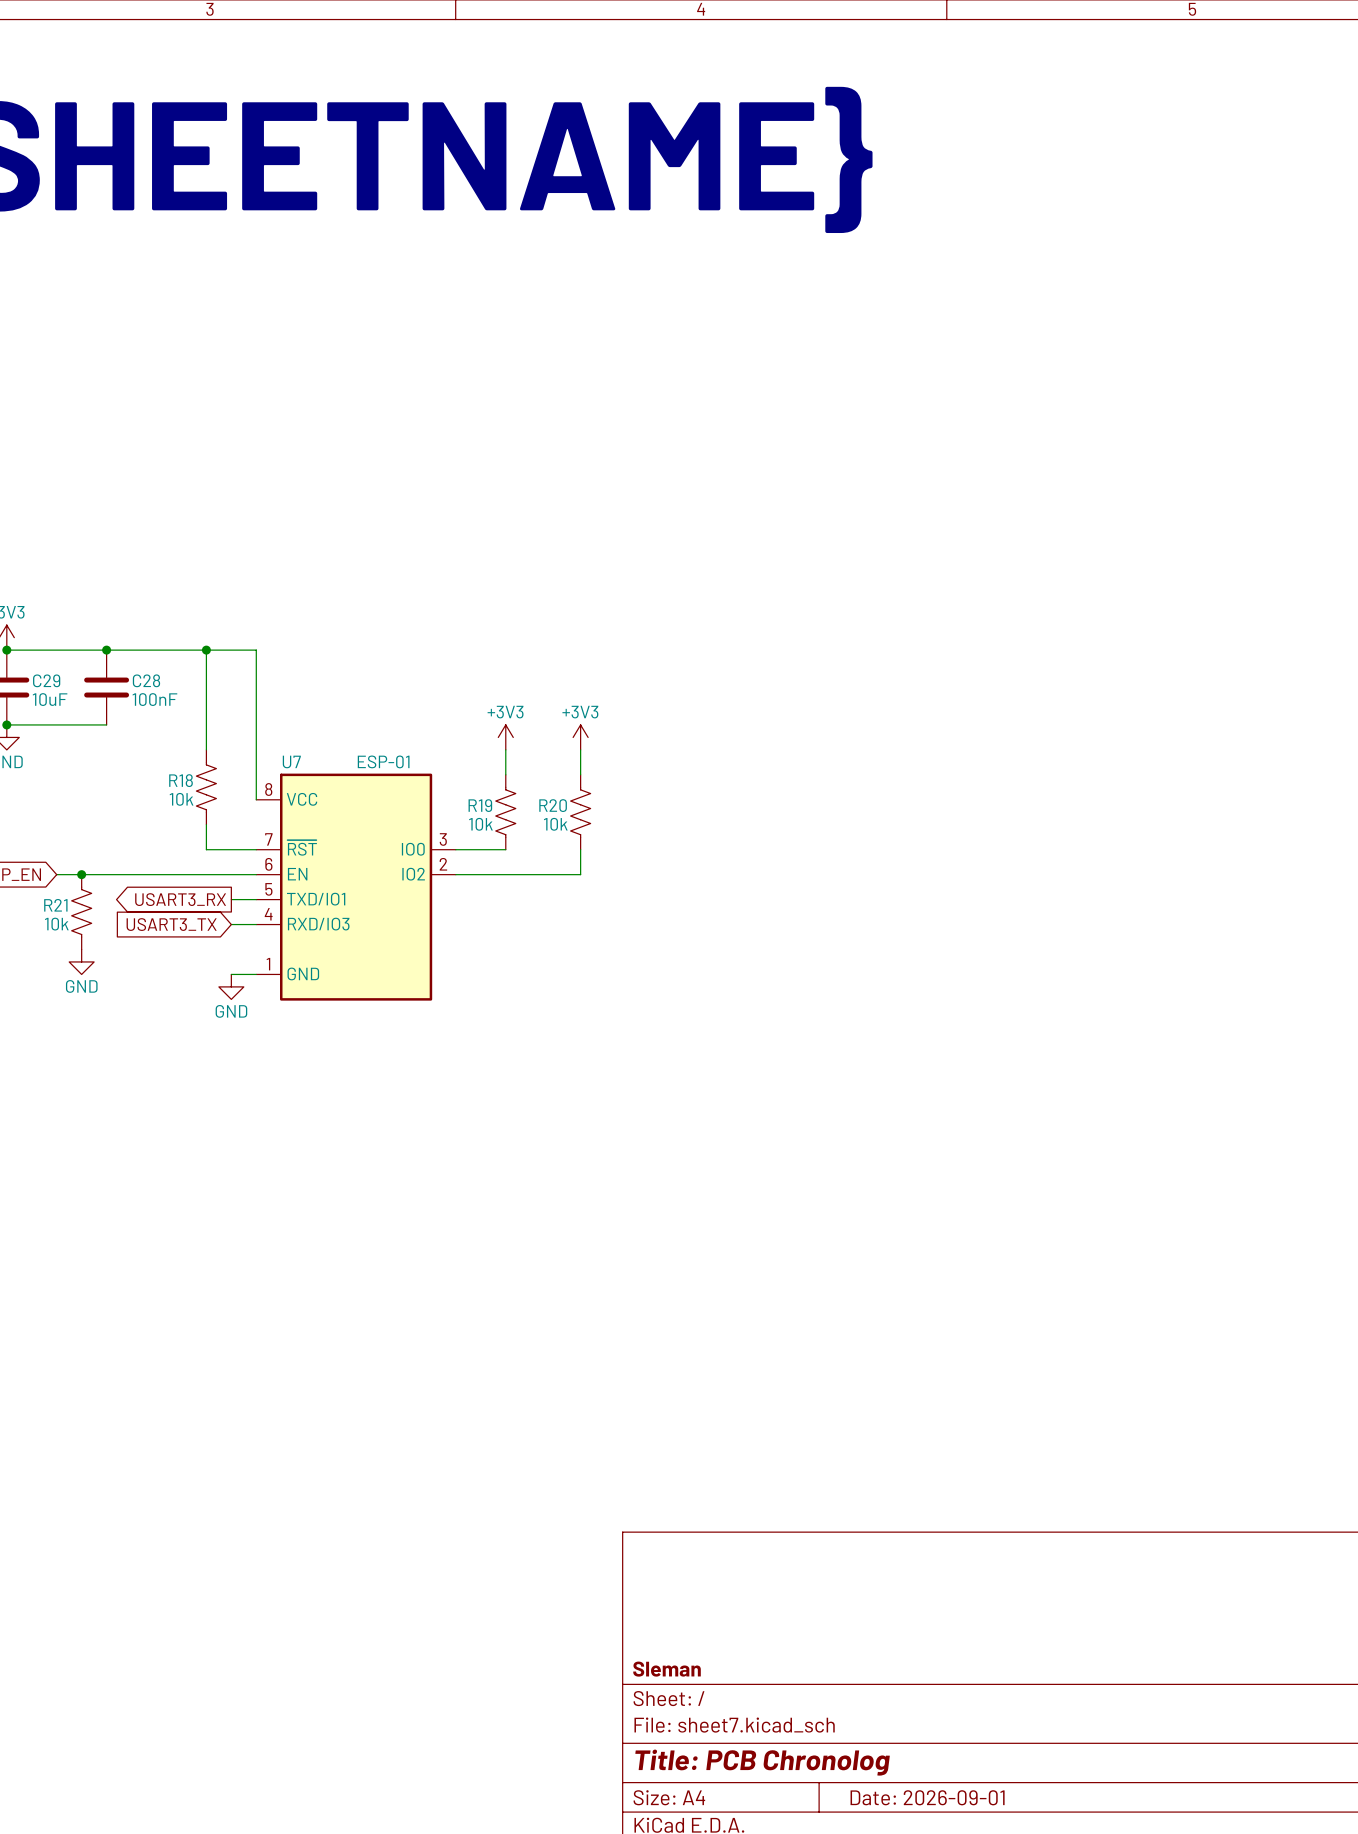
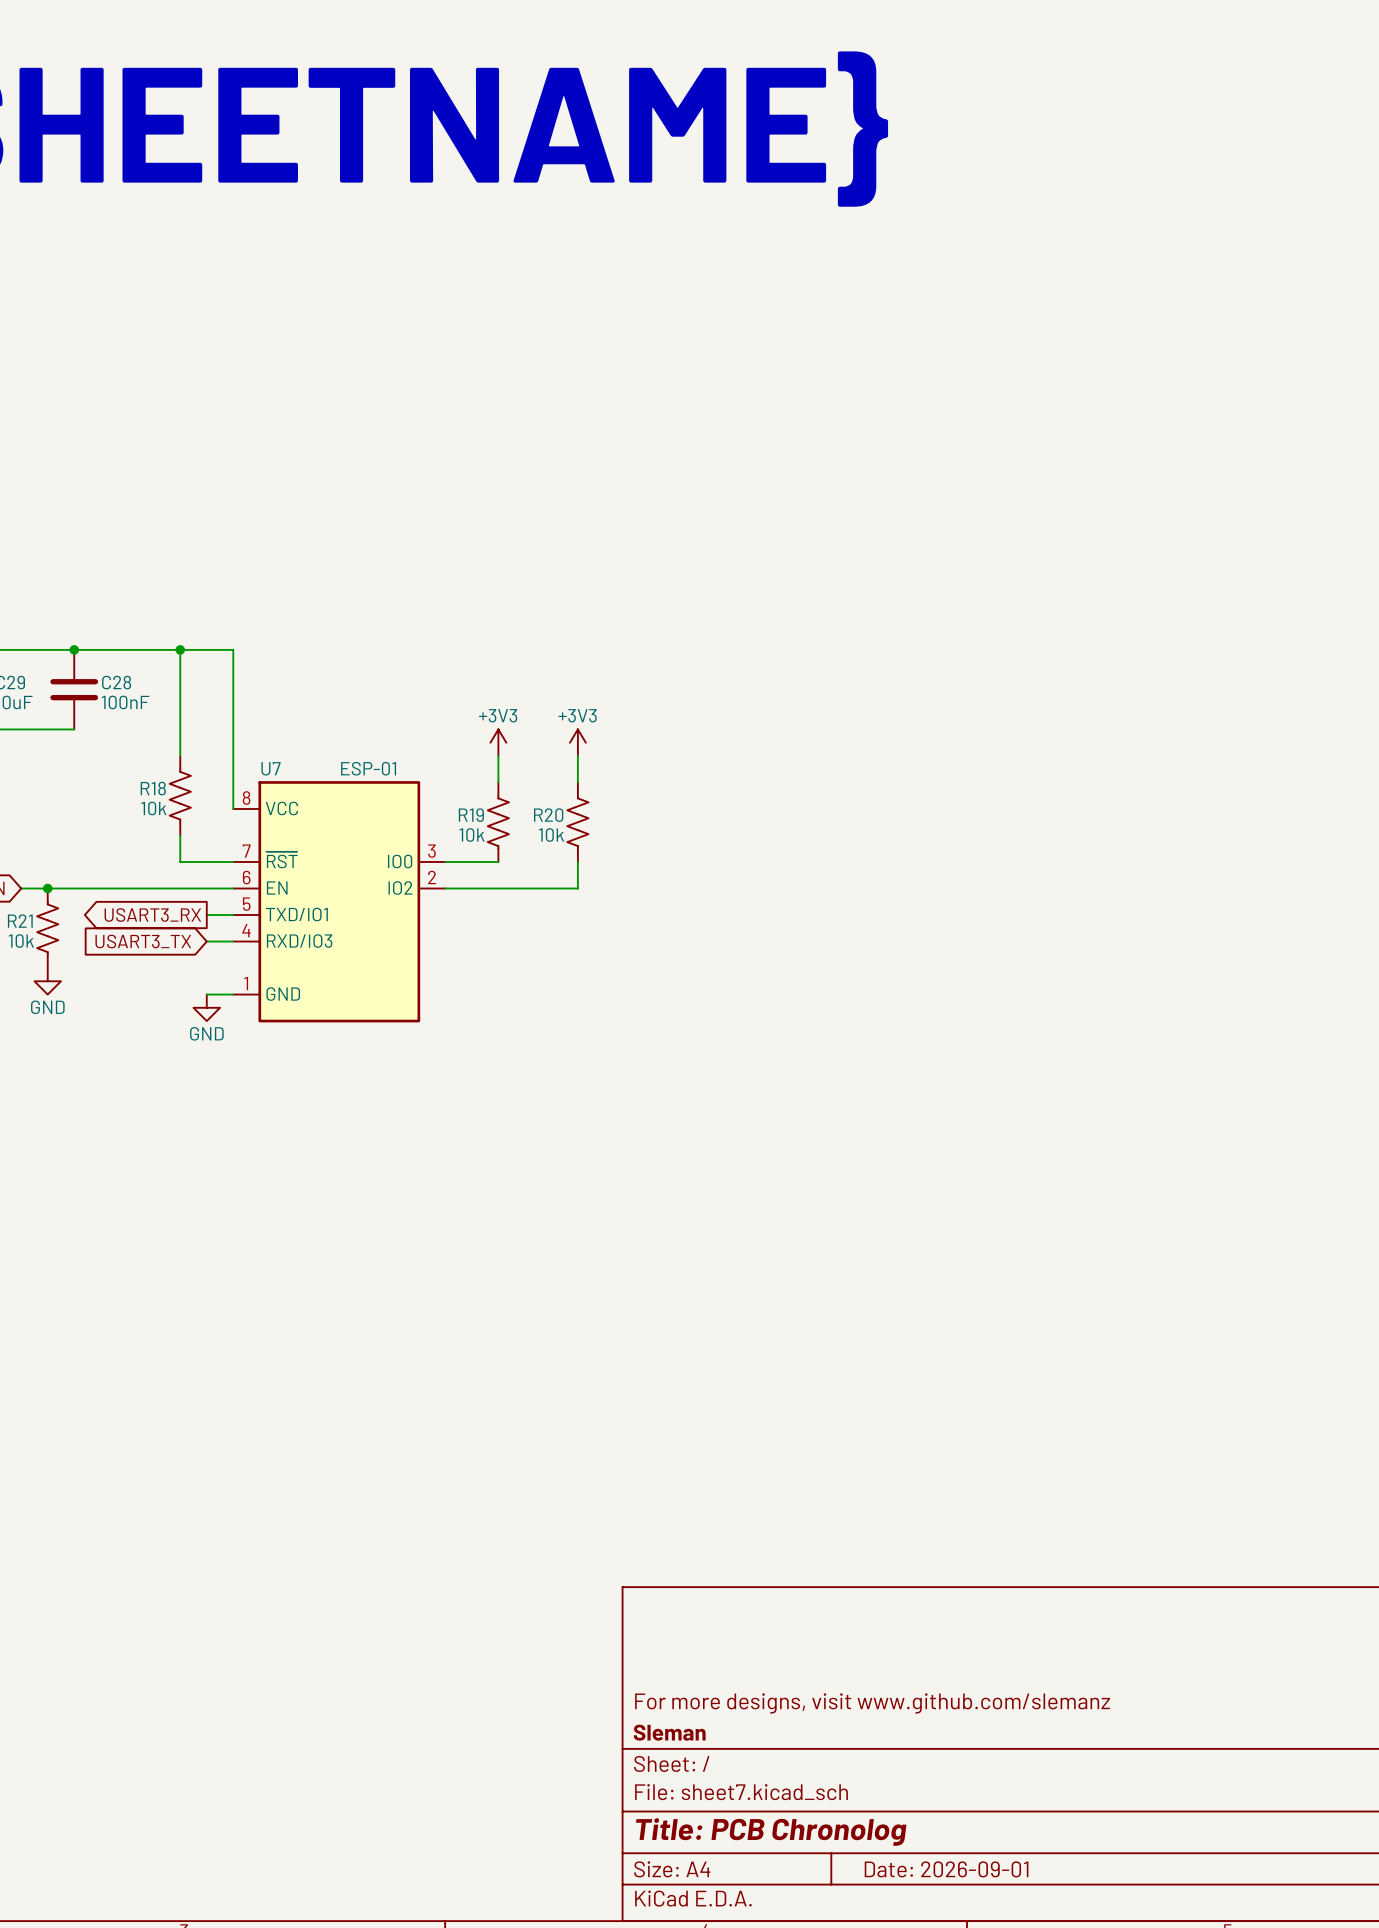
title block: none -> For more designs, visit www.github.com/slemanz (872, 1703)

